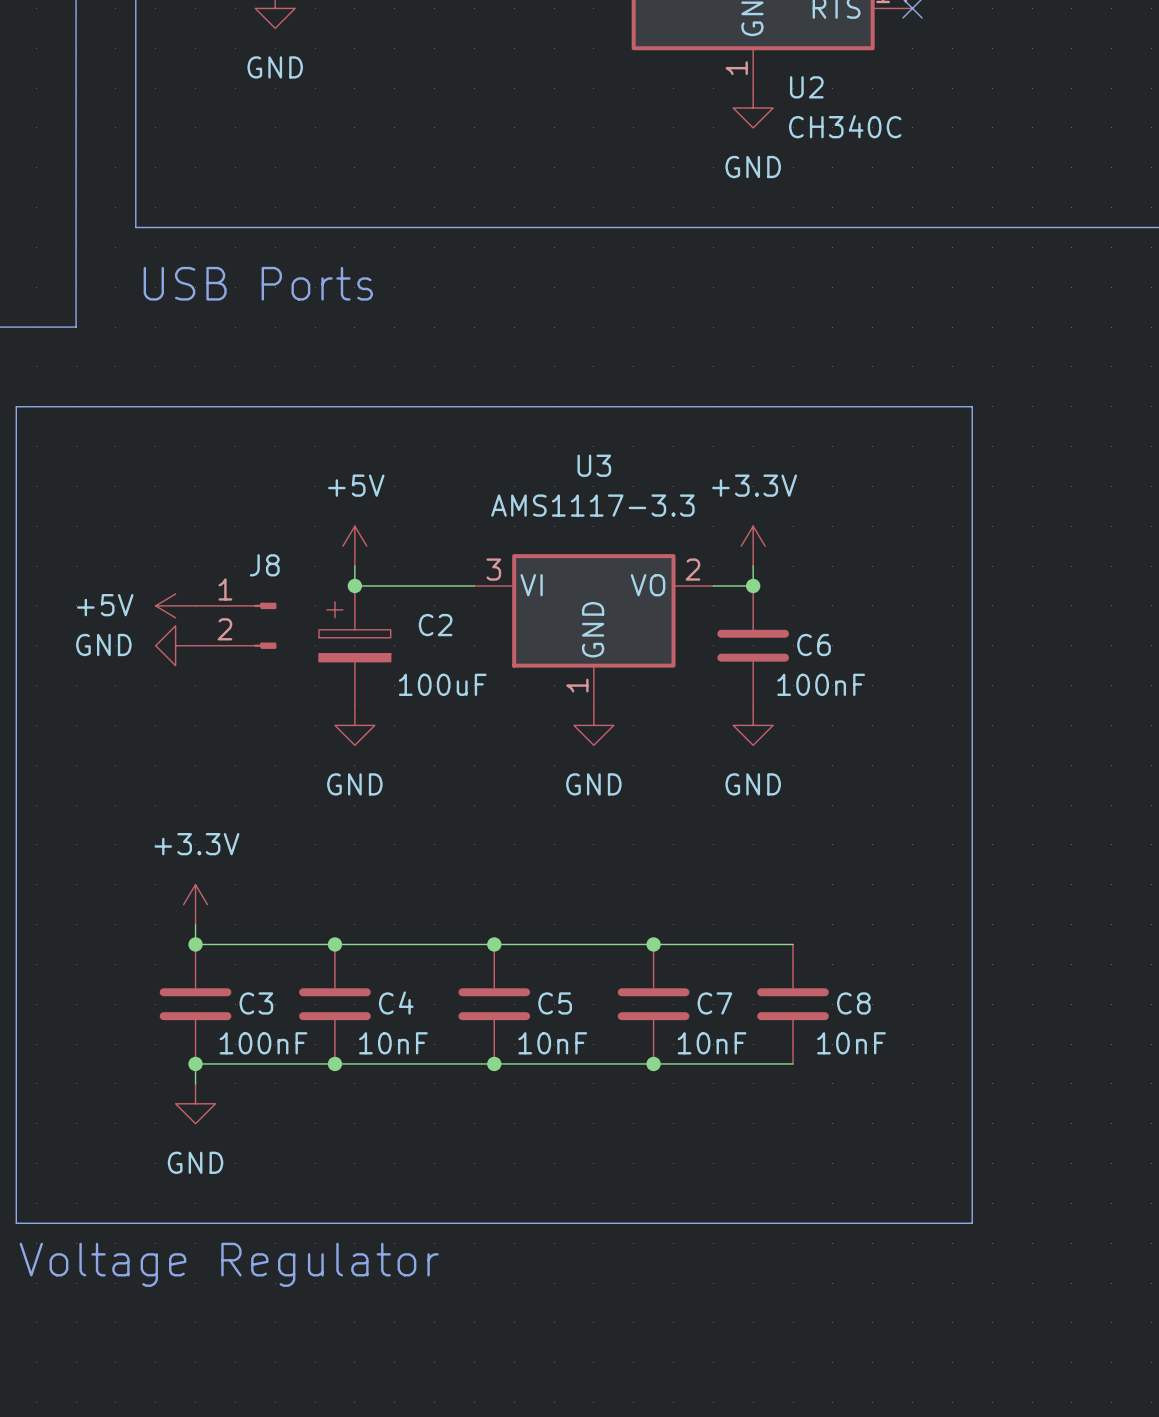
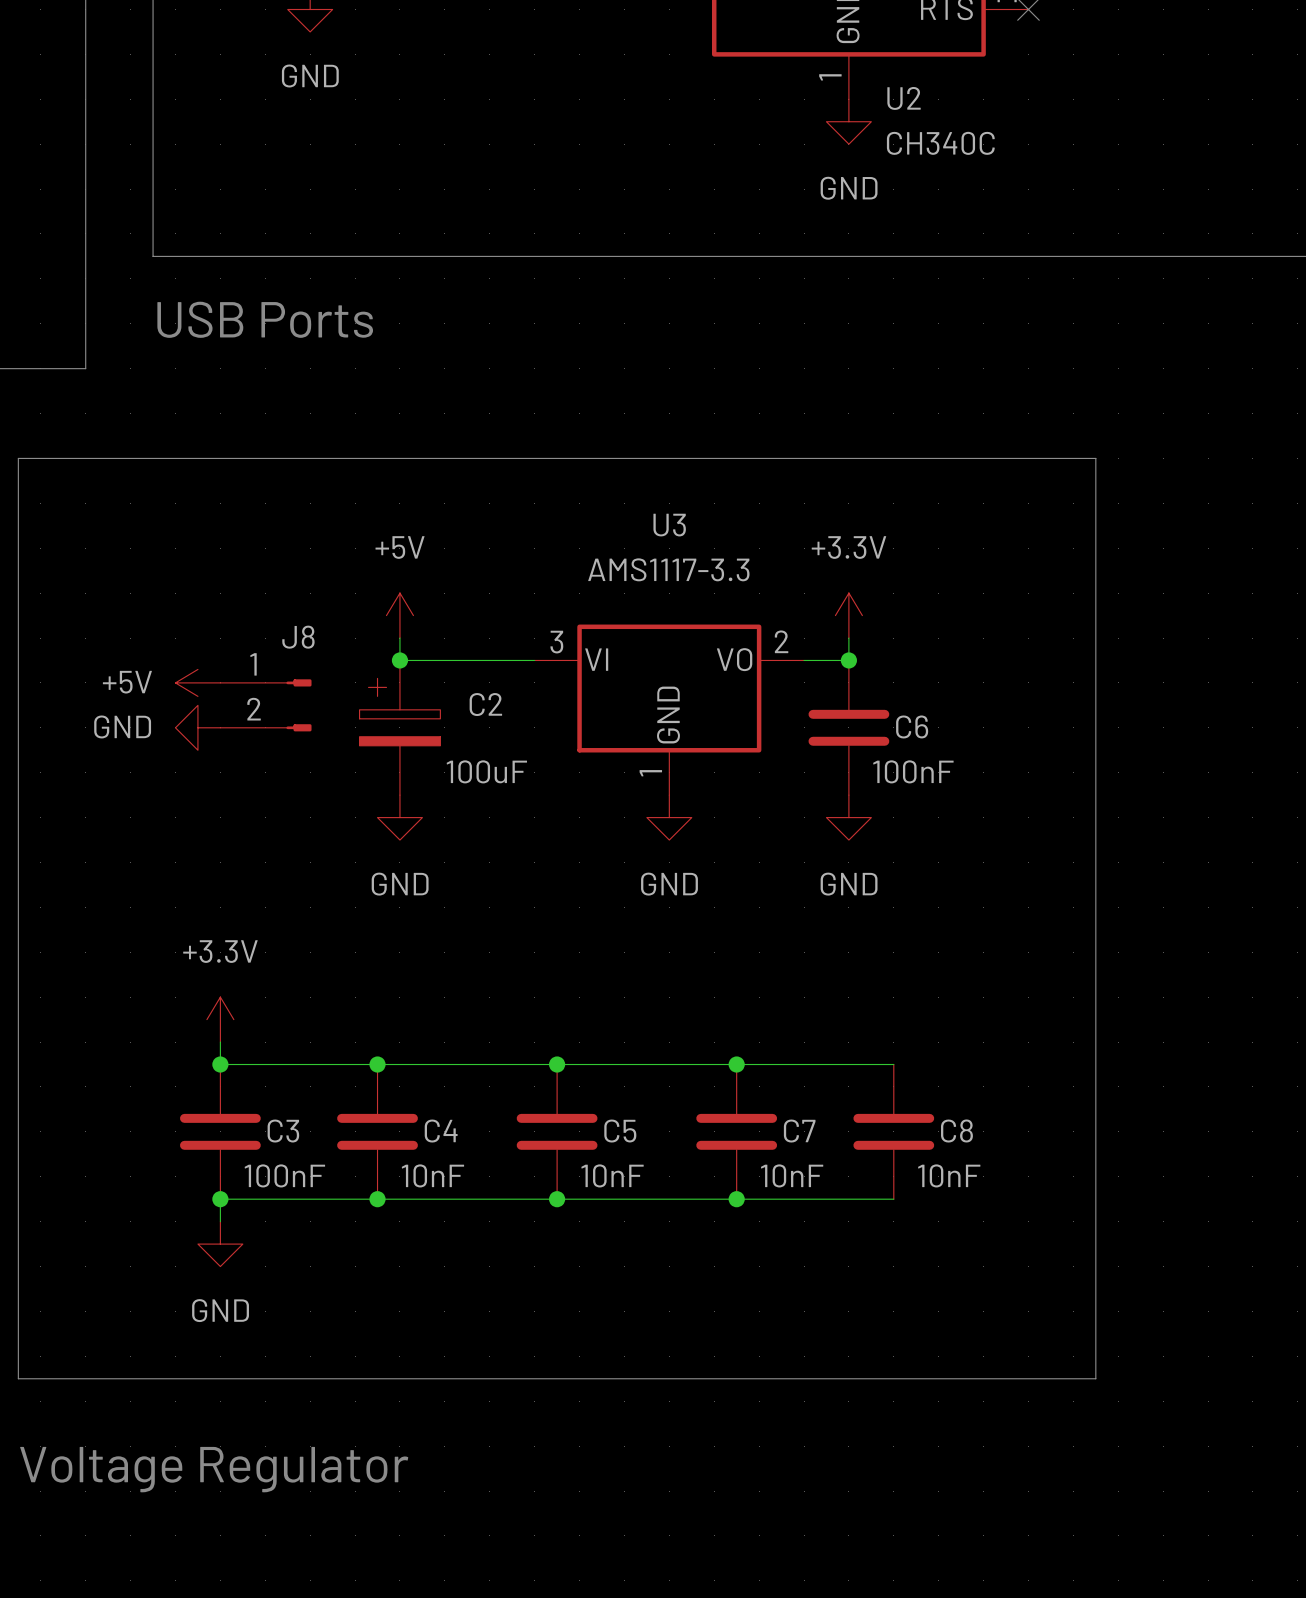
text position: Voltage Regulator (229, 1264) -> Voltage Regulator (214, 1469)

